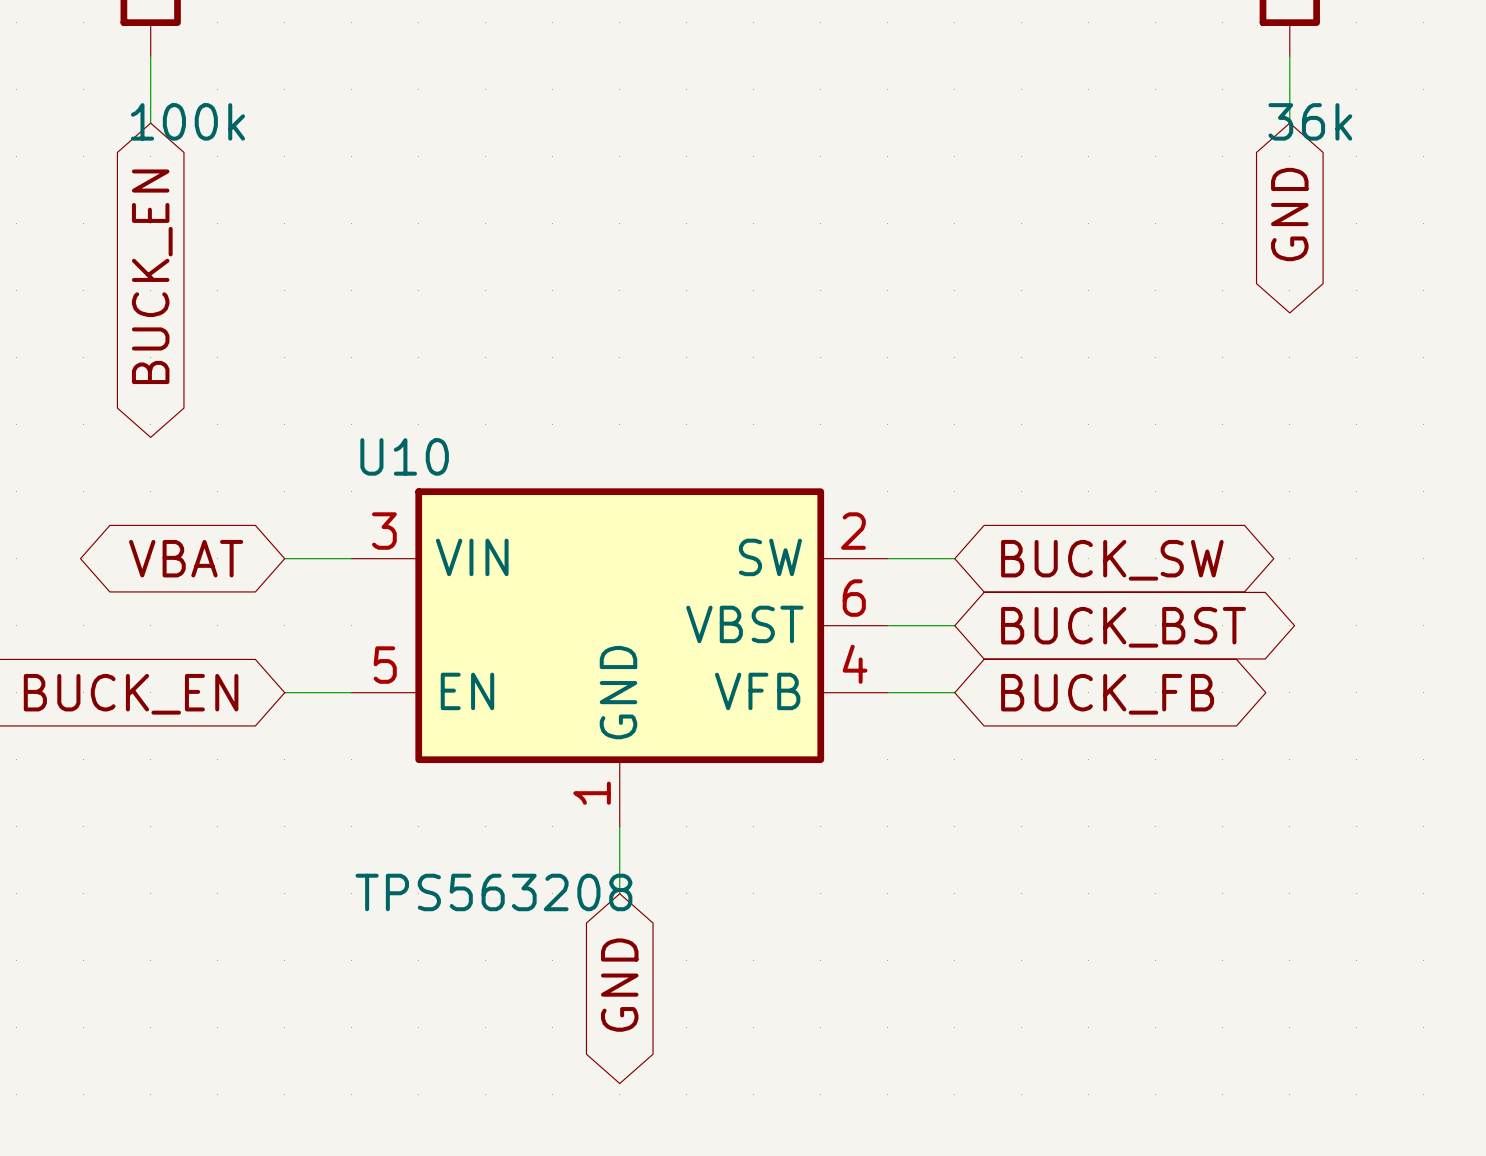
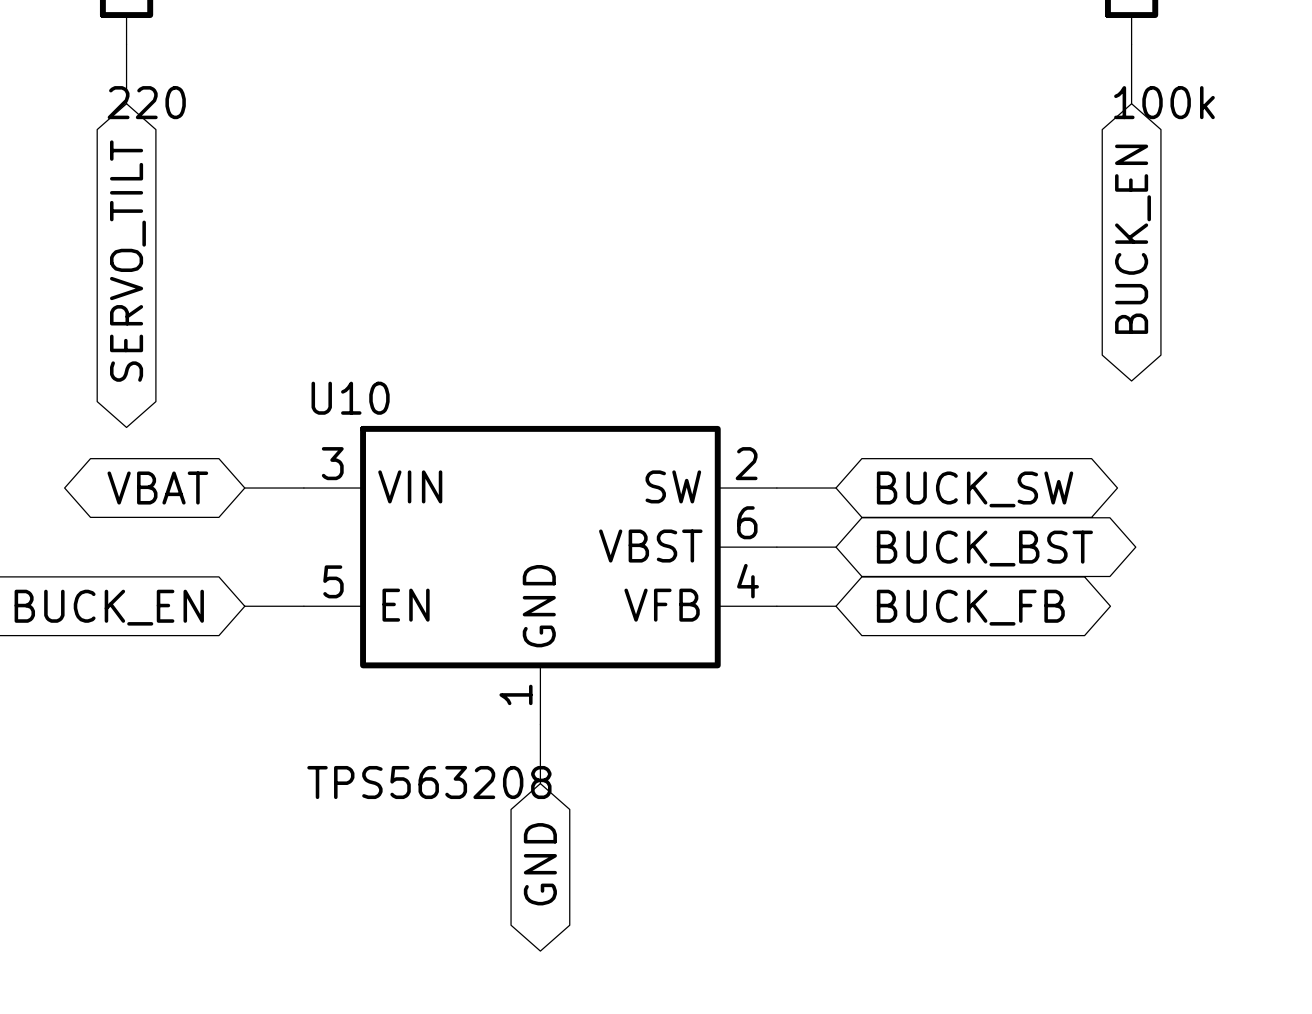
part value: 100k (187, 121) -> 220 (146, 102)
part value: 36k (1310, 121) -> 100k (1164, 102)
global label: GND (1289, 214) -> BUCK_EN (1133, 239)
global label: BUCK_EN (152, 276) -> SERVO_TILT (127, 261)

